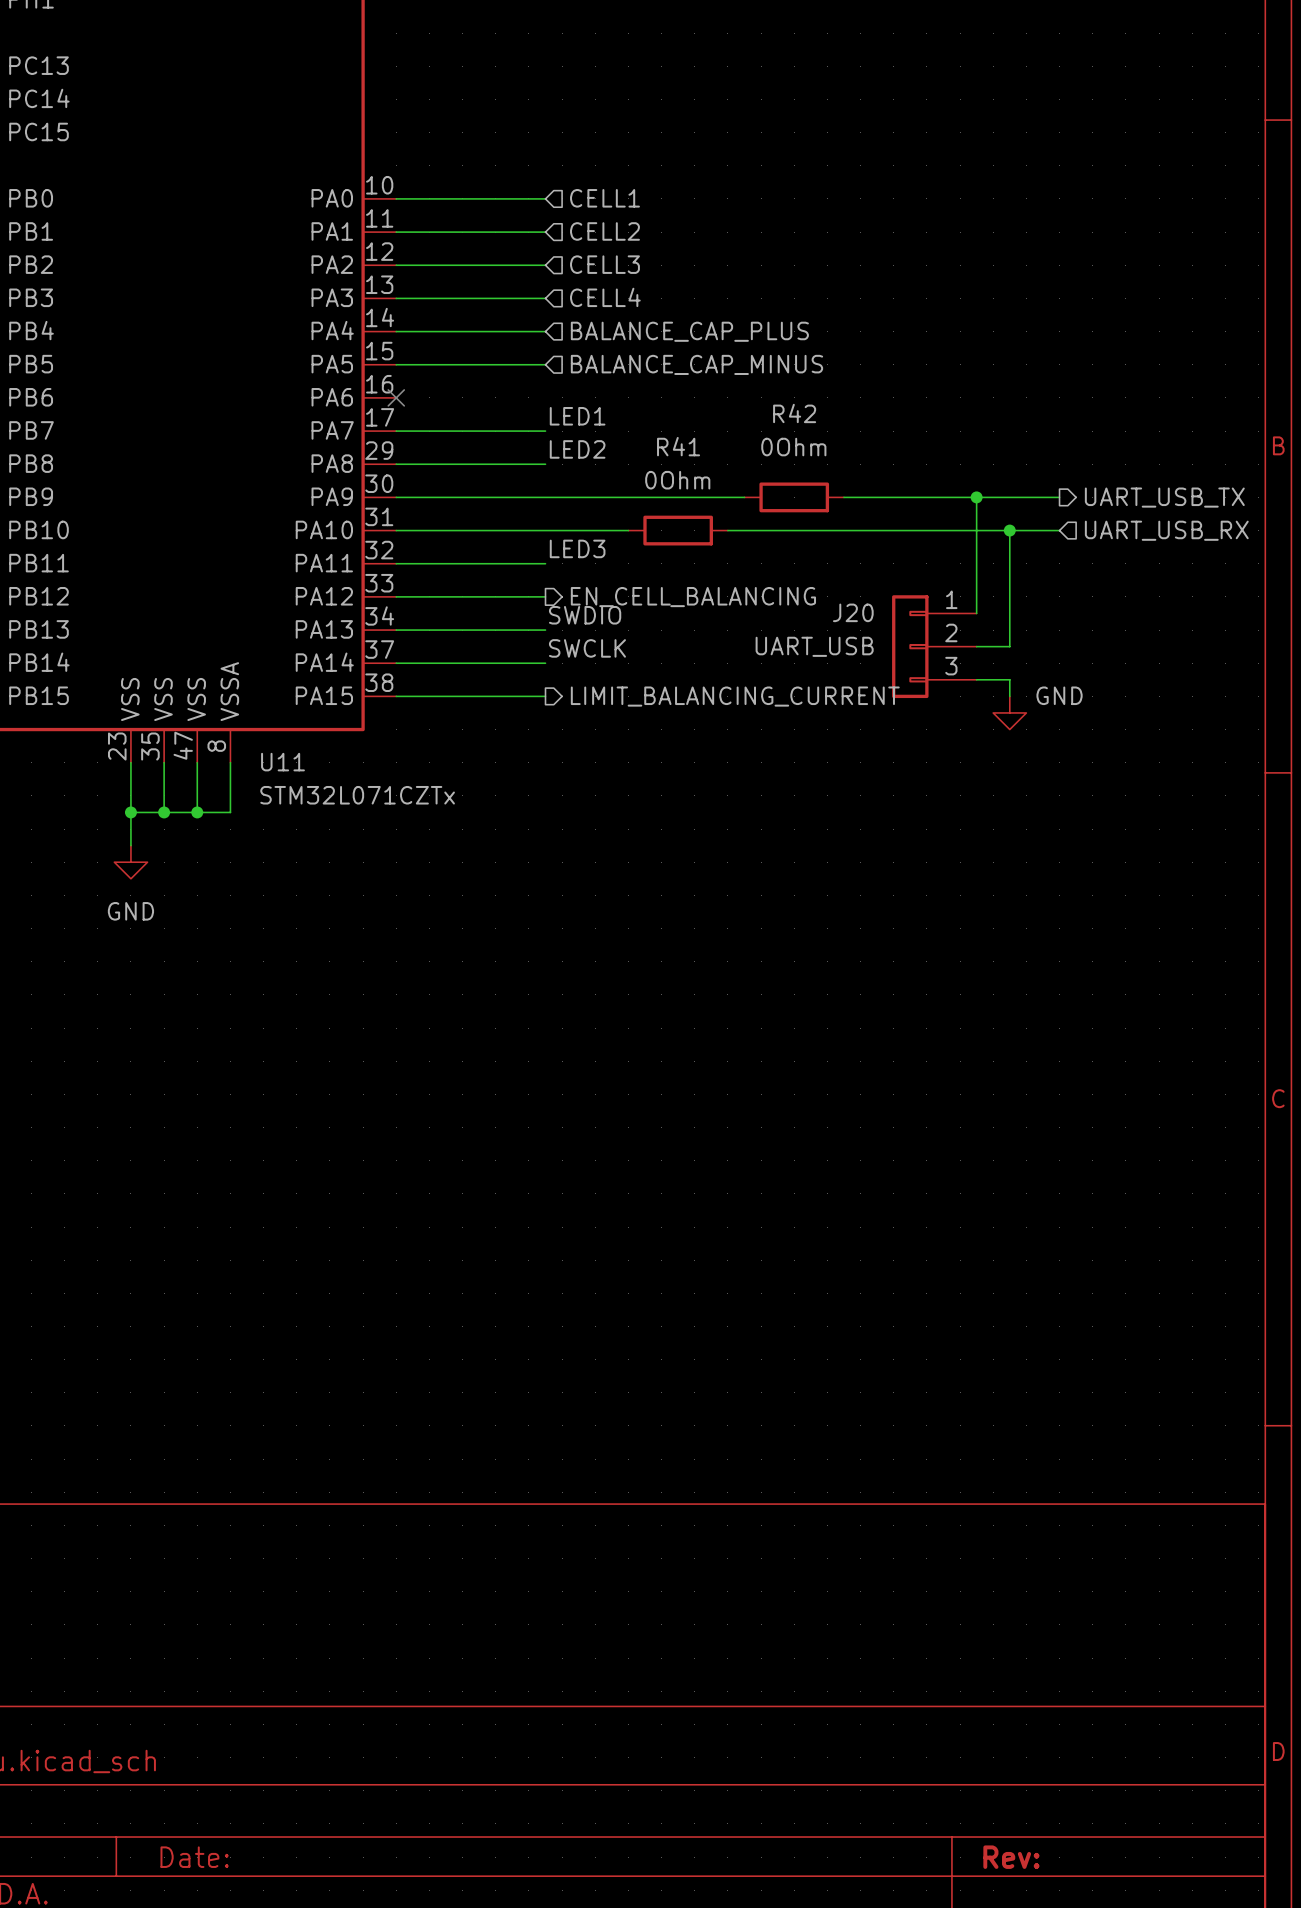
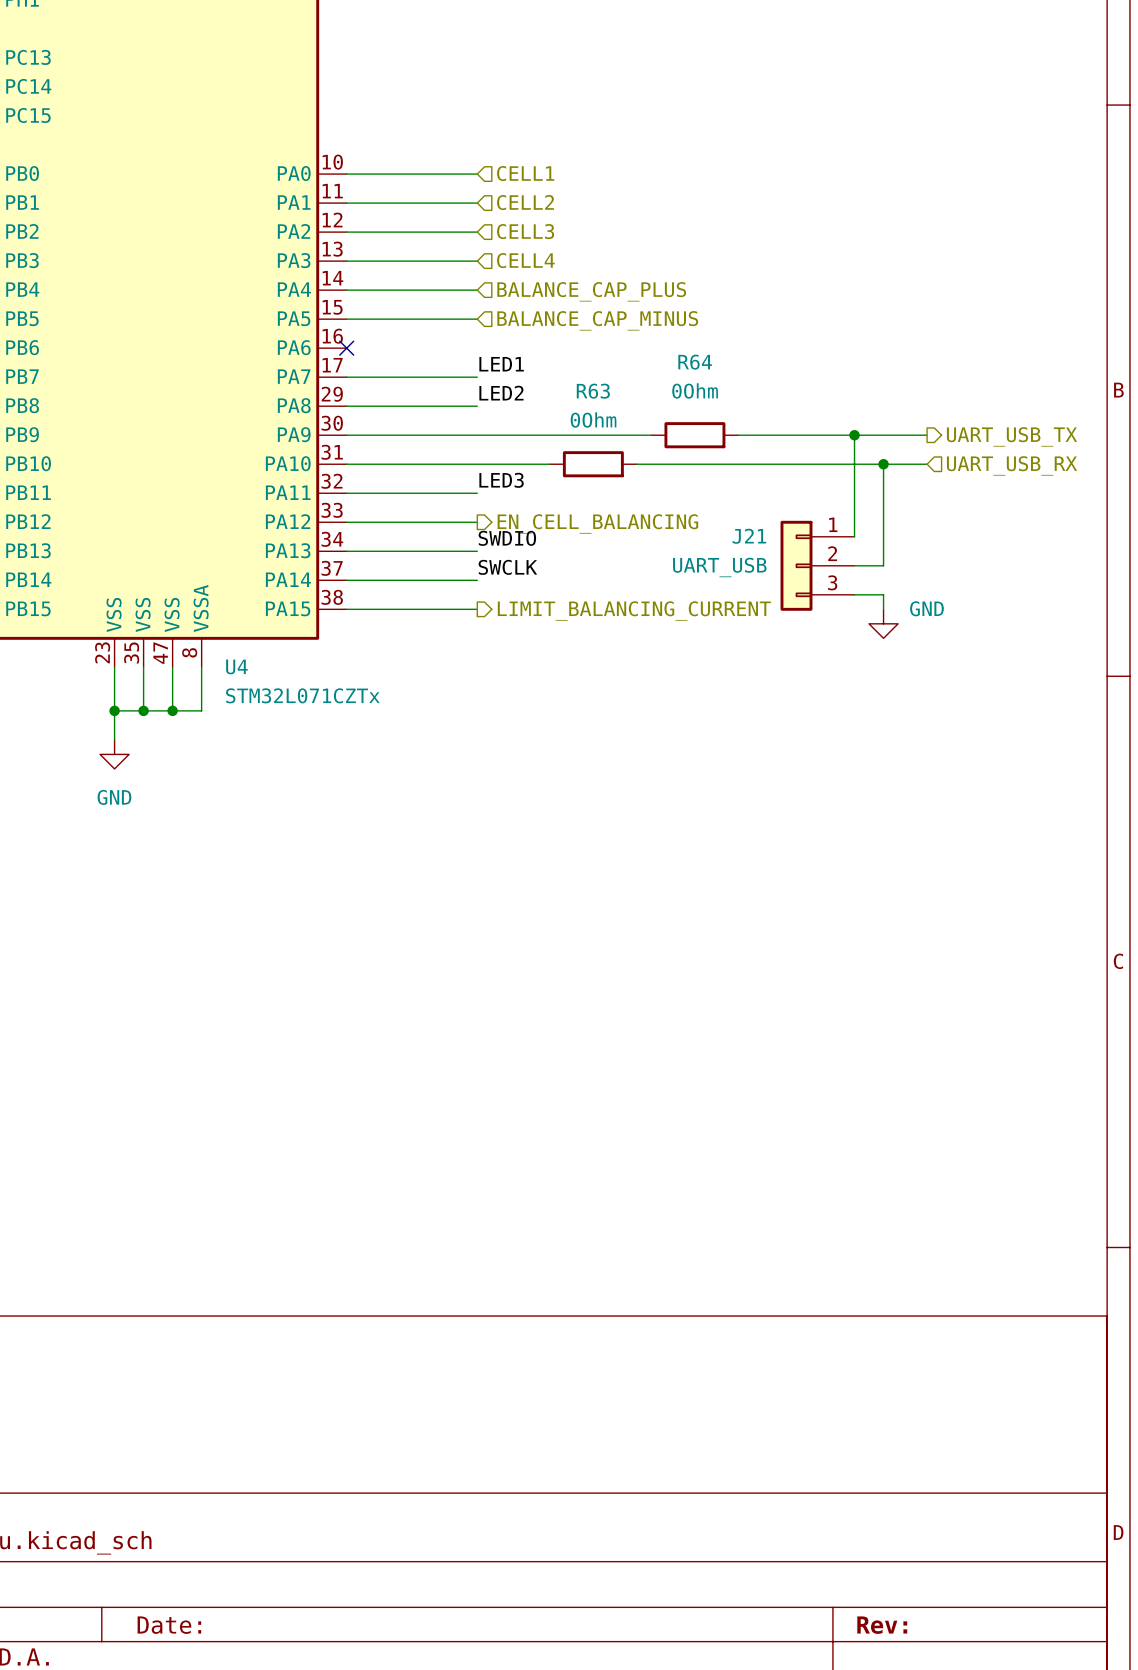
R42 name: R42 (794, 413) -> R64 (695, 362)
R41 name: R41 (678, 446) -> R63 (593, 391)
J20 name: J20 (853, 612) -> J21 (749, 536)
U11 name: U11 (282, 762) -> U4 (236, 666)

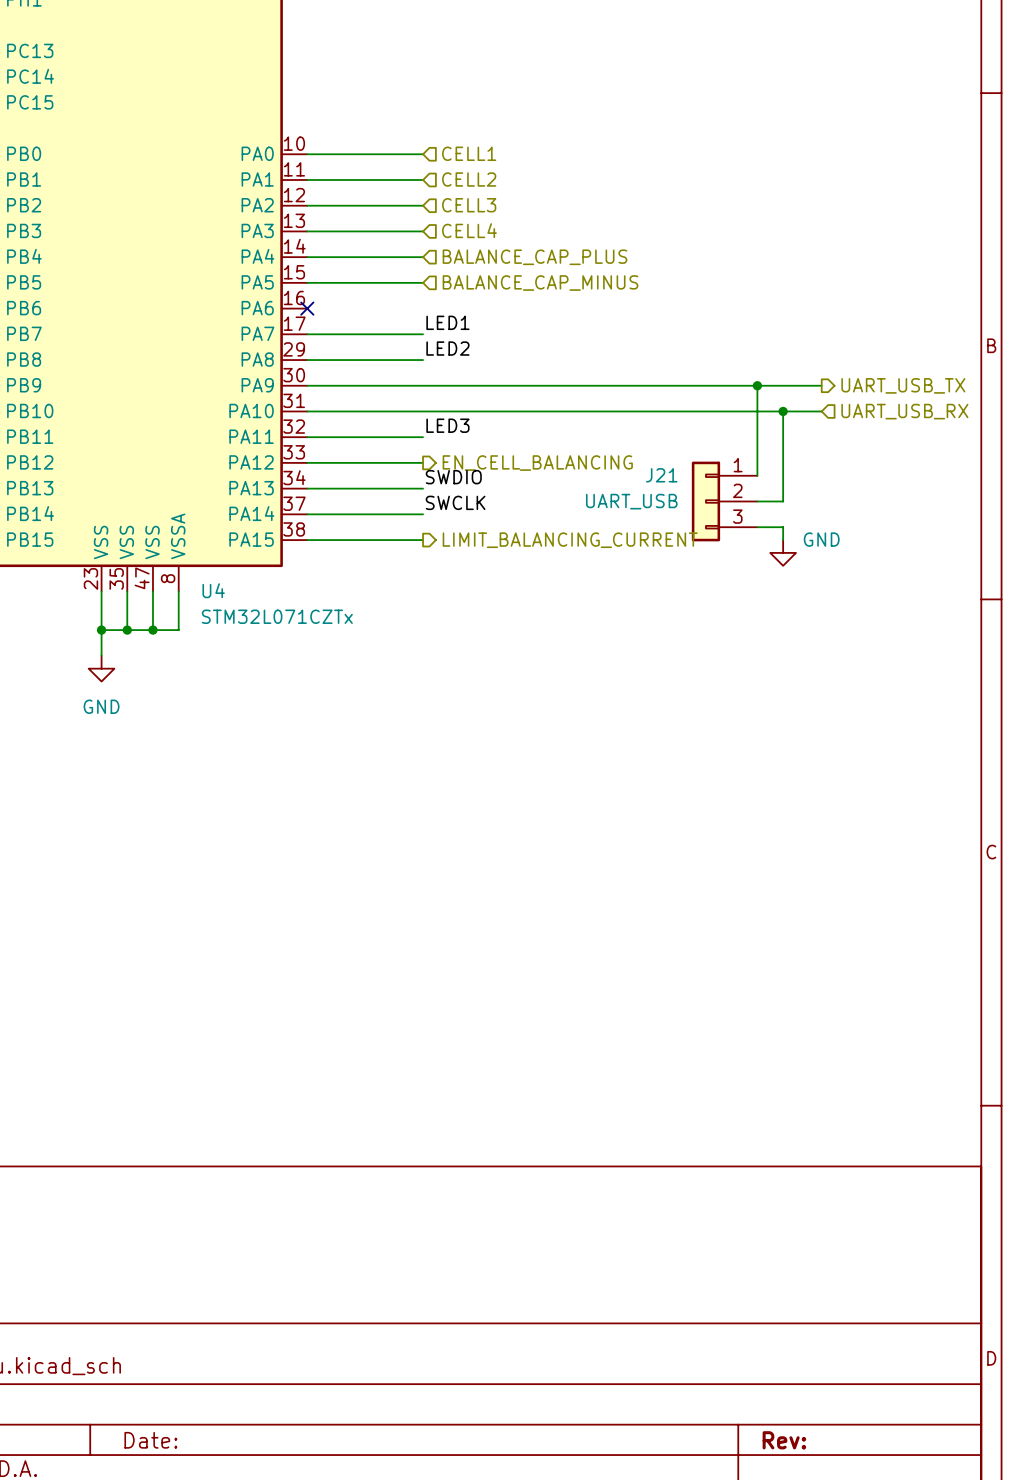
wire: none -> (577, 385) (654, 385)
R64: 0Ohm (694, 435) -> none
wire: none -> (487, 411) (564, 411)
R63: 0Ohm (593, 464) -> none

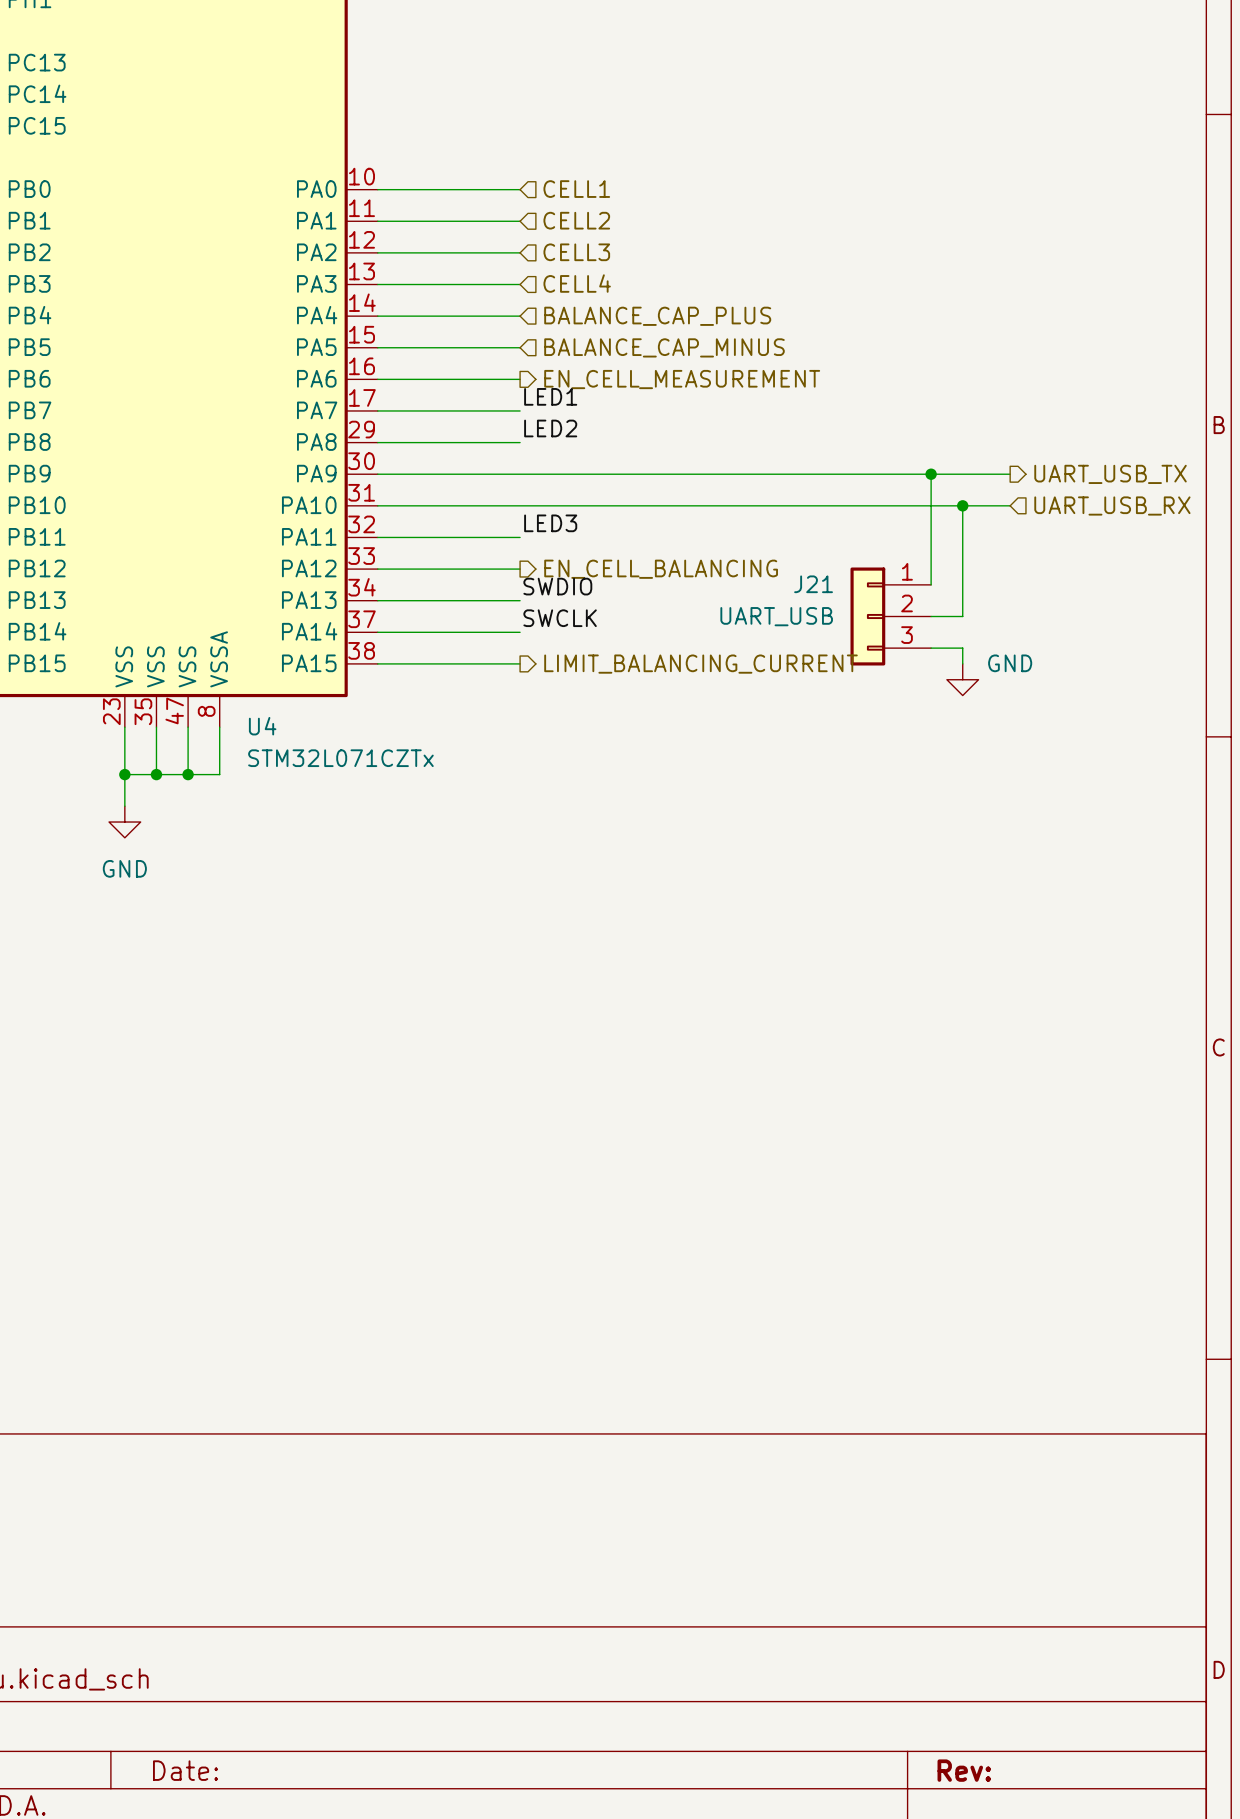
wire: none -> (377, 379) (520, 379)
no-connect mark: (307, 308) -> none
hierarchical label: none -> EN_CELL_MEASUREMENT (682, 379)

